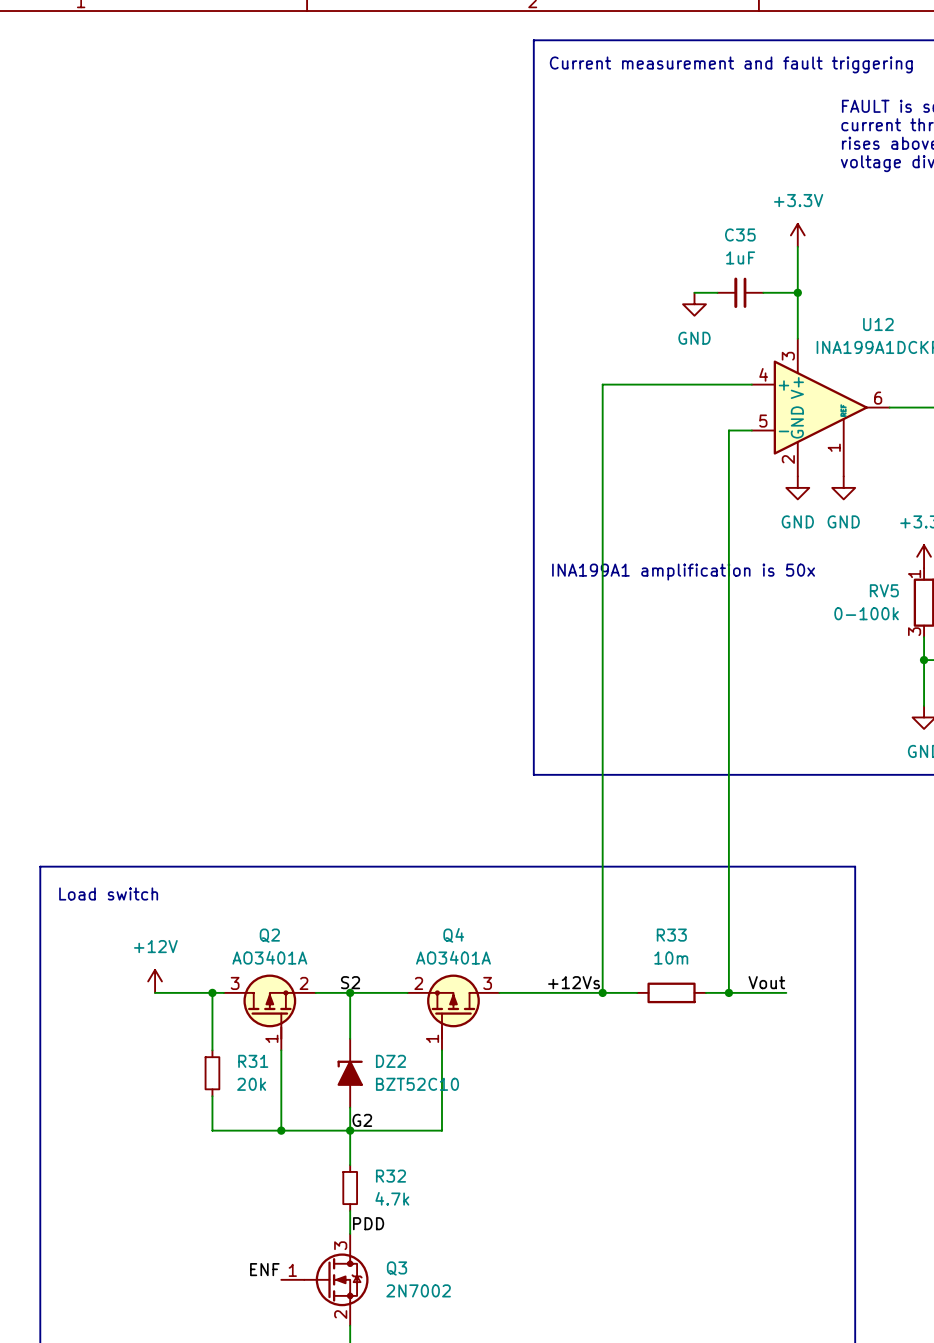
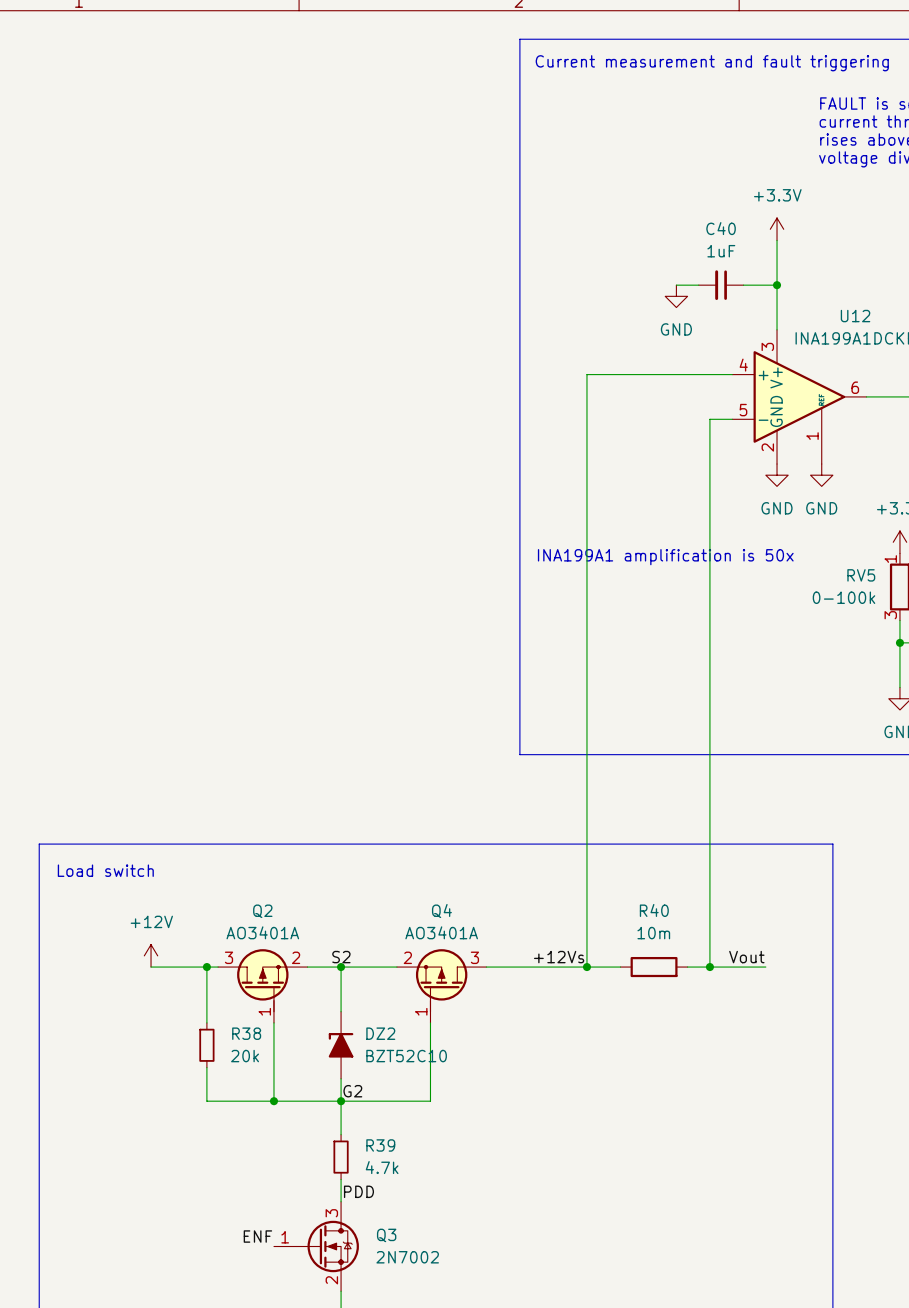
C35 name: C35 (740, 234) -> C40 (721, 228)
R33 name: R33 (671, 935) -> R40 (654, 910)
R31 name: R31 (253, 1061) -> R38 (246, 1033)
R32 name: R32 (390, 1176) -> R39 (380, 1145)

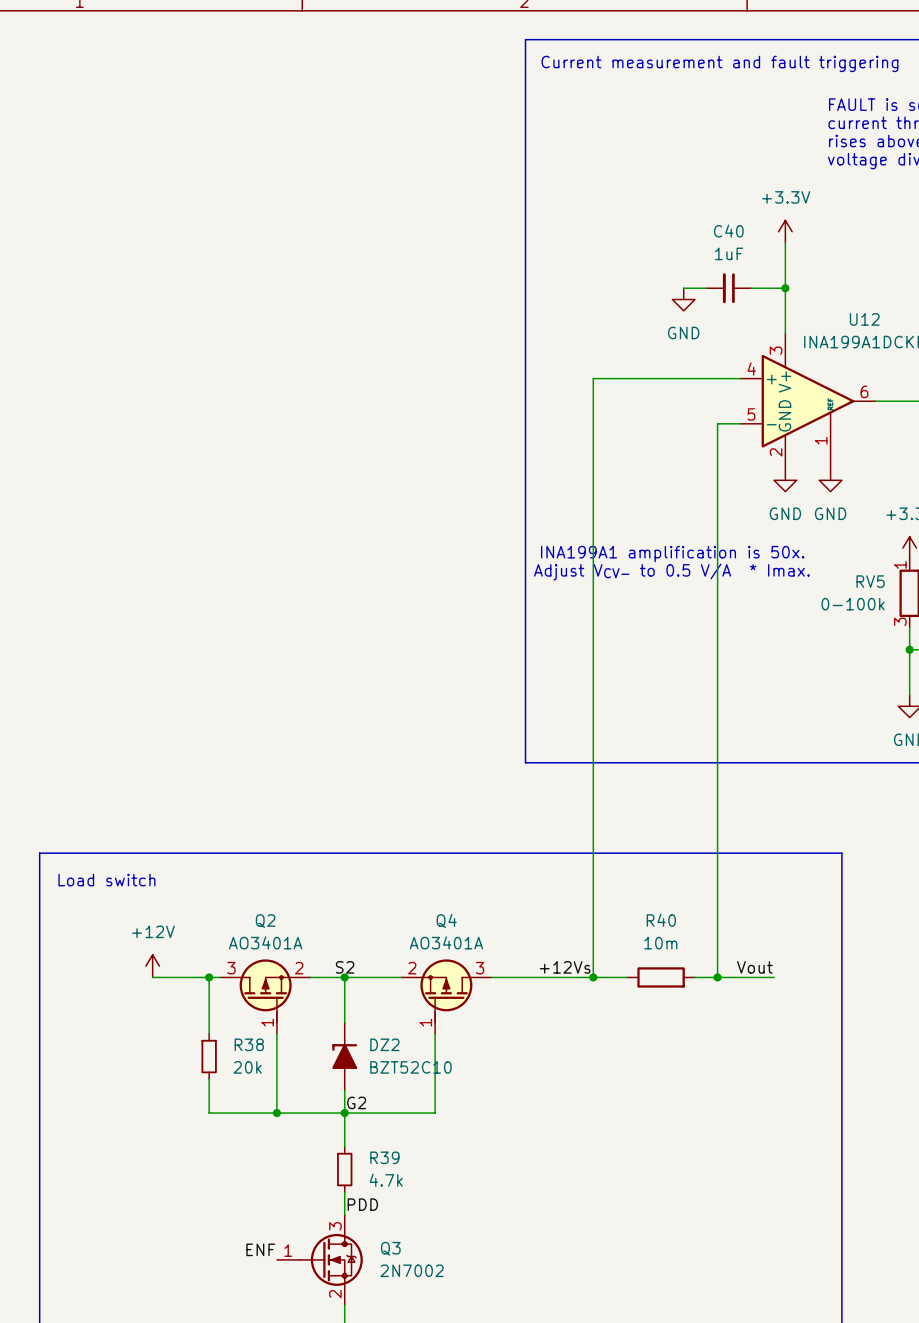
text: INA199A1 amplification is 50x (665, 557) -> INA199A1 amplification is 50x. (672, 554)
text: none -> Adjust VCV- to 0.5 V/A * Imax. (671, 571)

